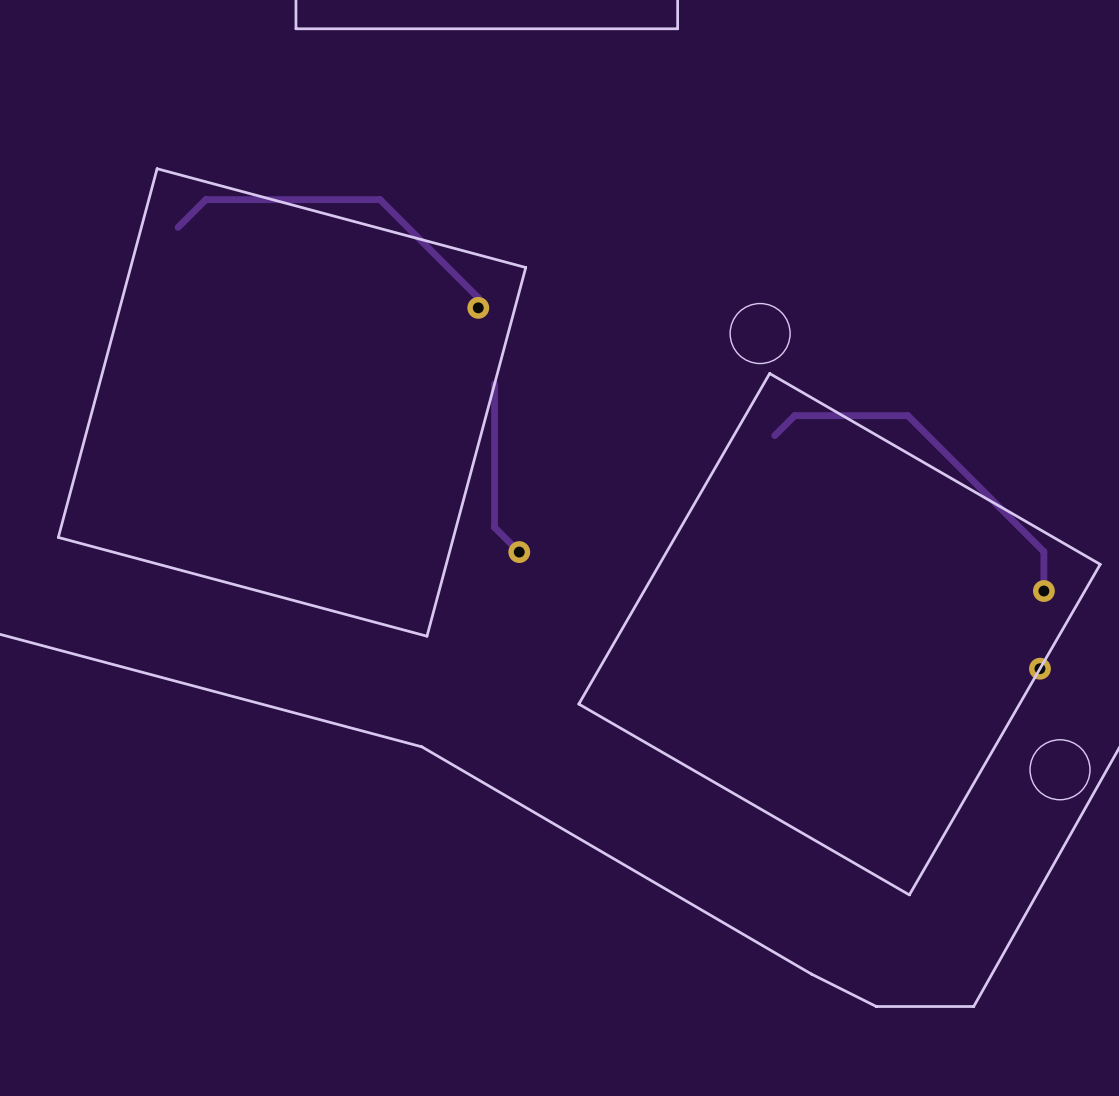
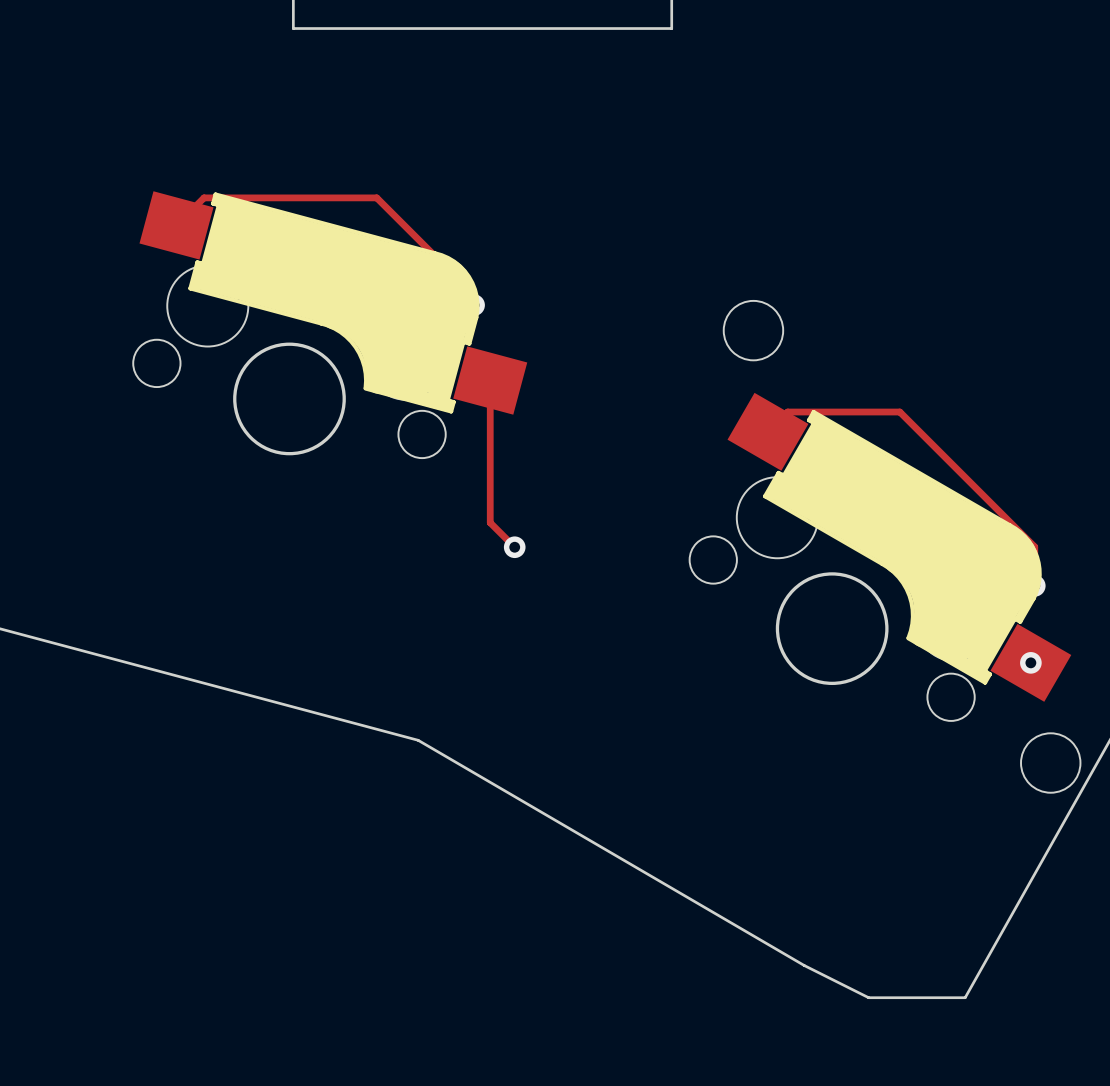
drawing: [56, 167, 528, 638] -> none
part: none -> (330, 324)
drawing: [577, 372, 1102, 897] -> none
part: none -> (880, 556)

